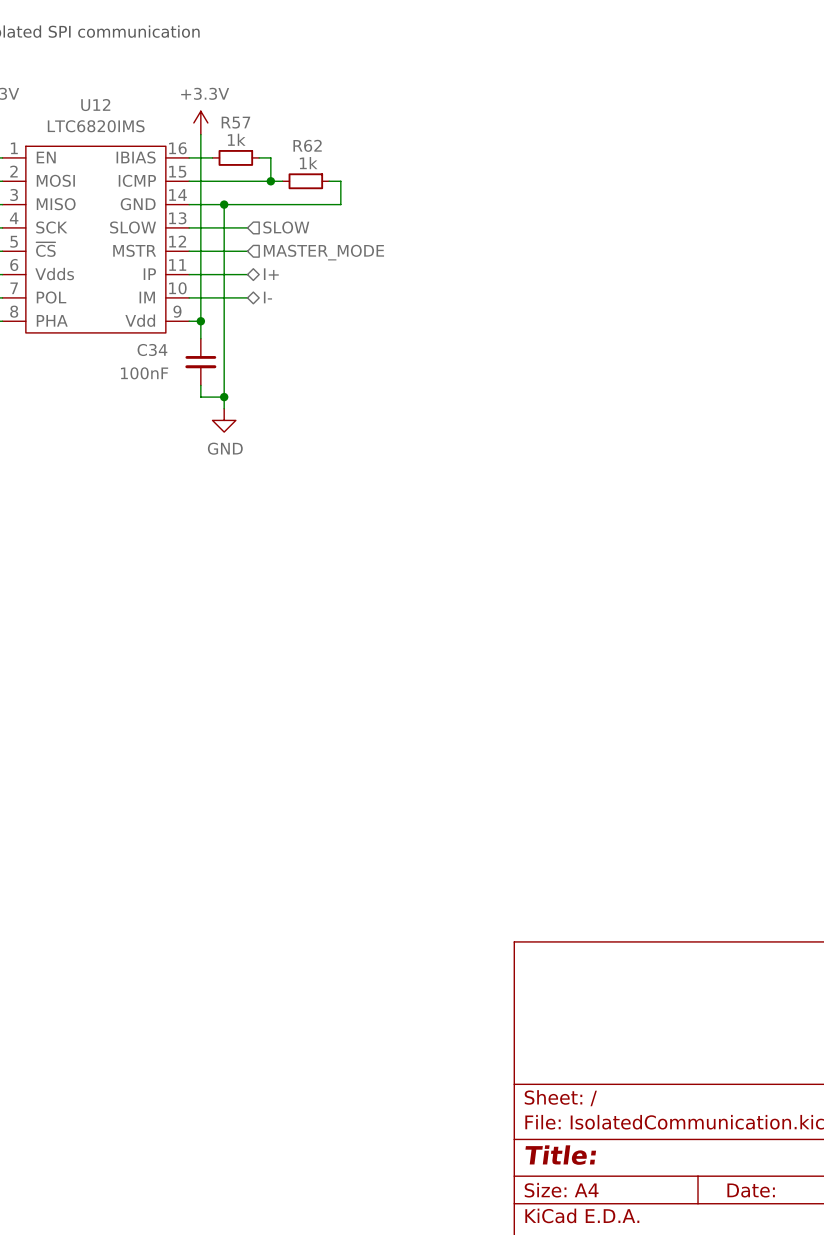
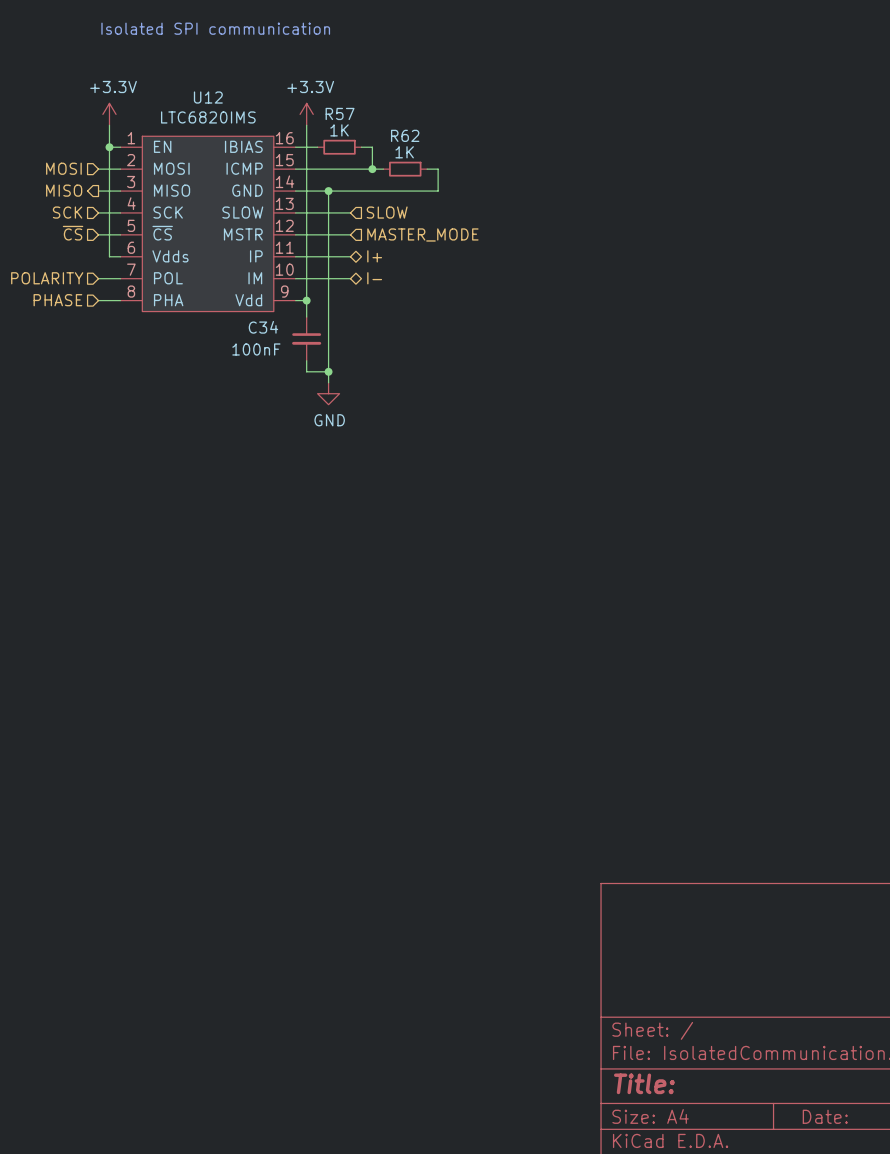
R57 value: 1k (236, 139) -> 1K (339, 130)
R62 value: 1k (308, 163) -> 1K (404, 152)

